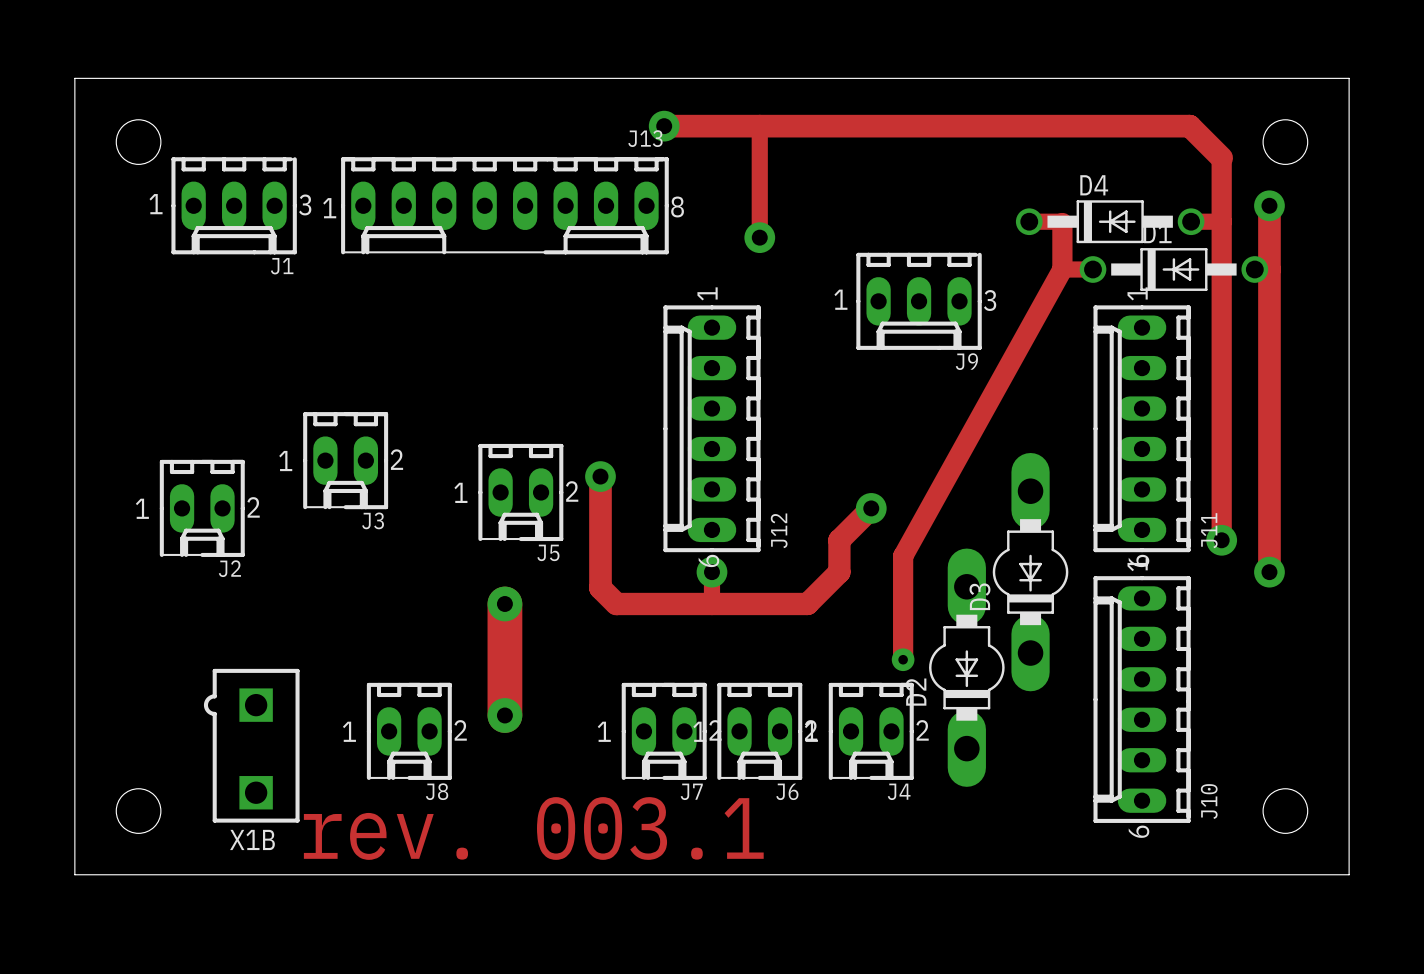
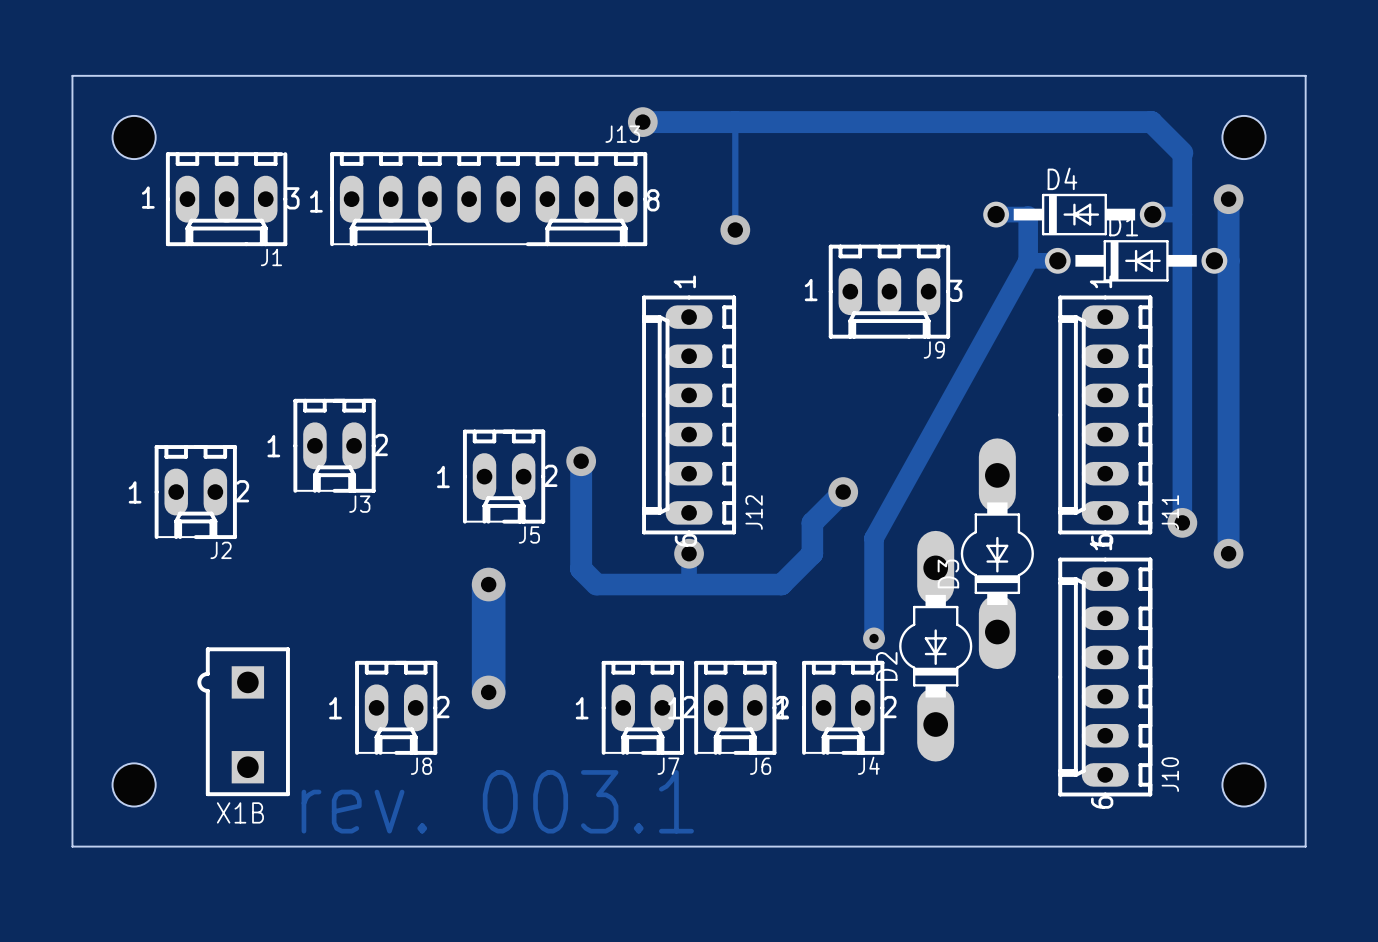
track width: thick (759, 126) (759, 237) -> thin (735, 122) (735, 229)

